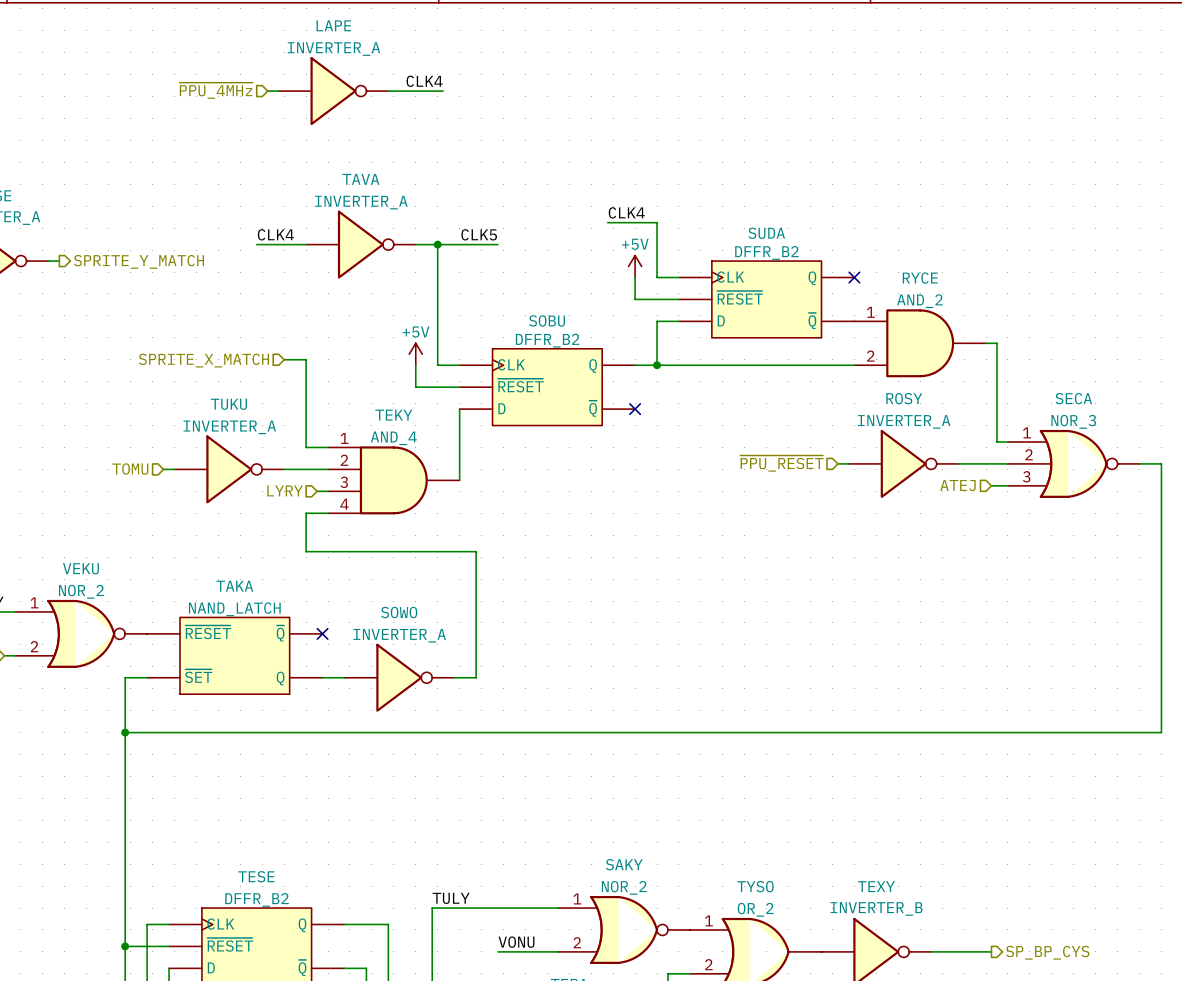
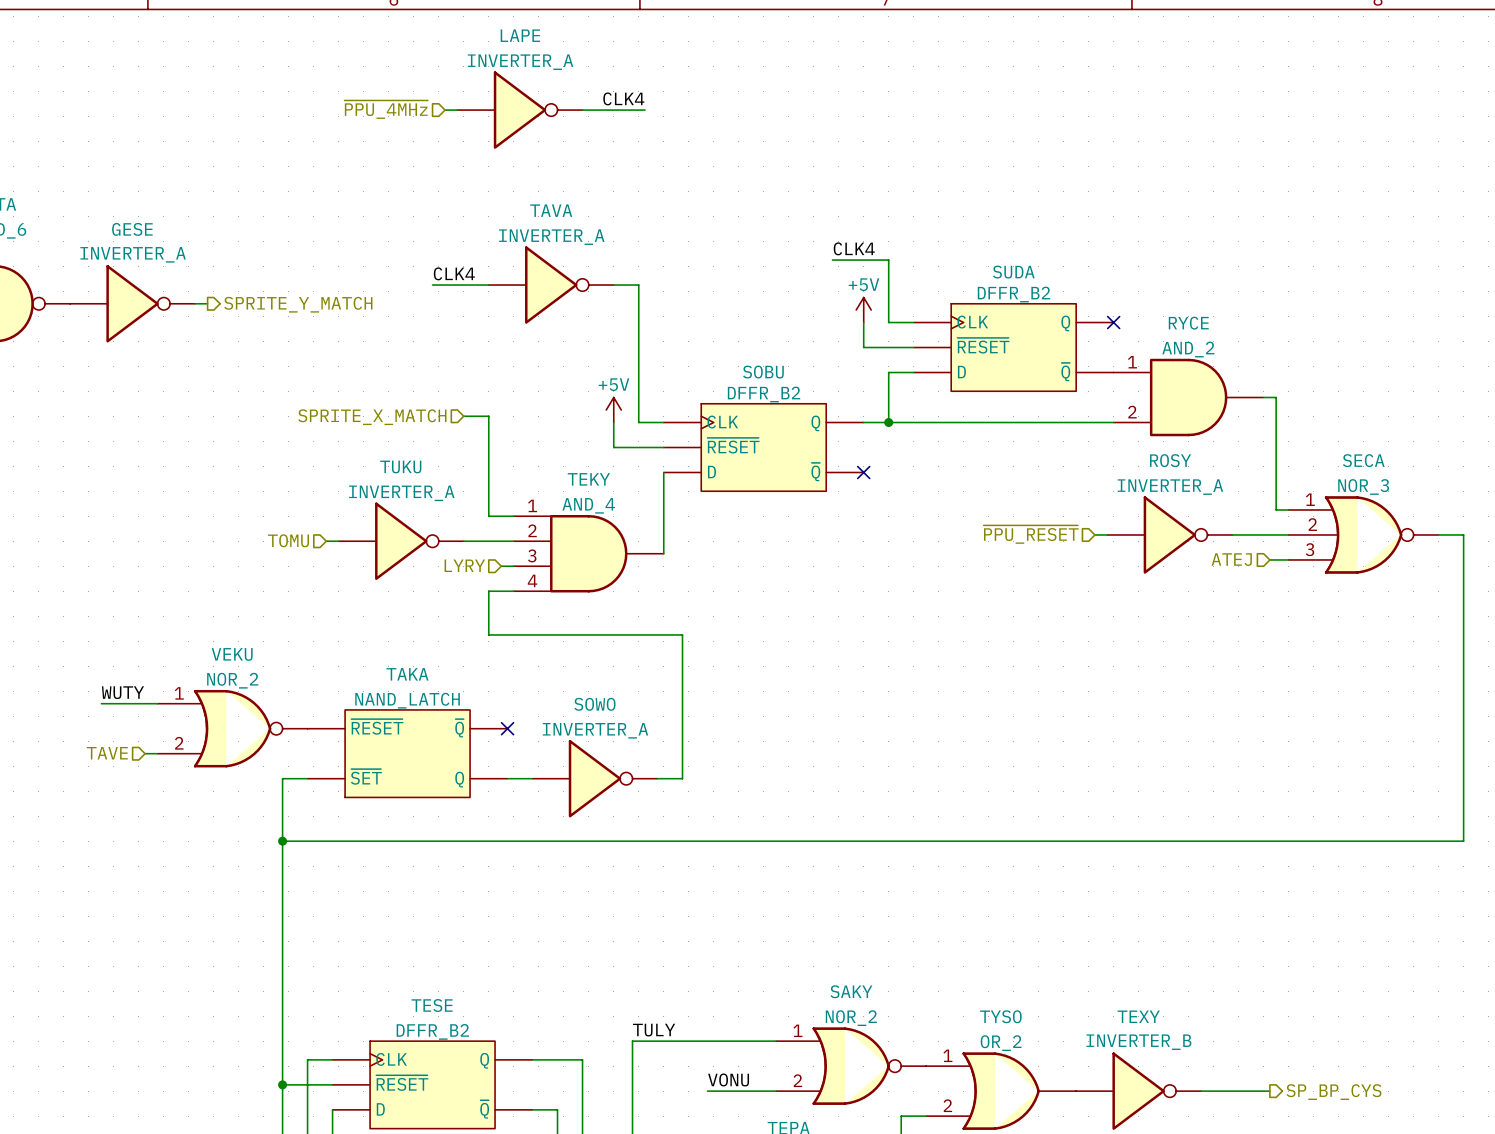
label: CLK5 (479, 234) -> none
wire: (437, 244) (498, 244) -> none
junction: (437, 244) -> none

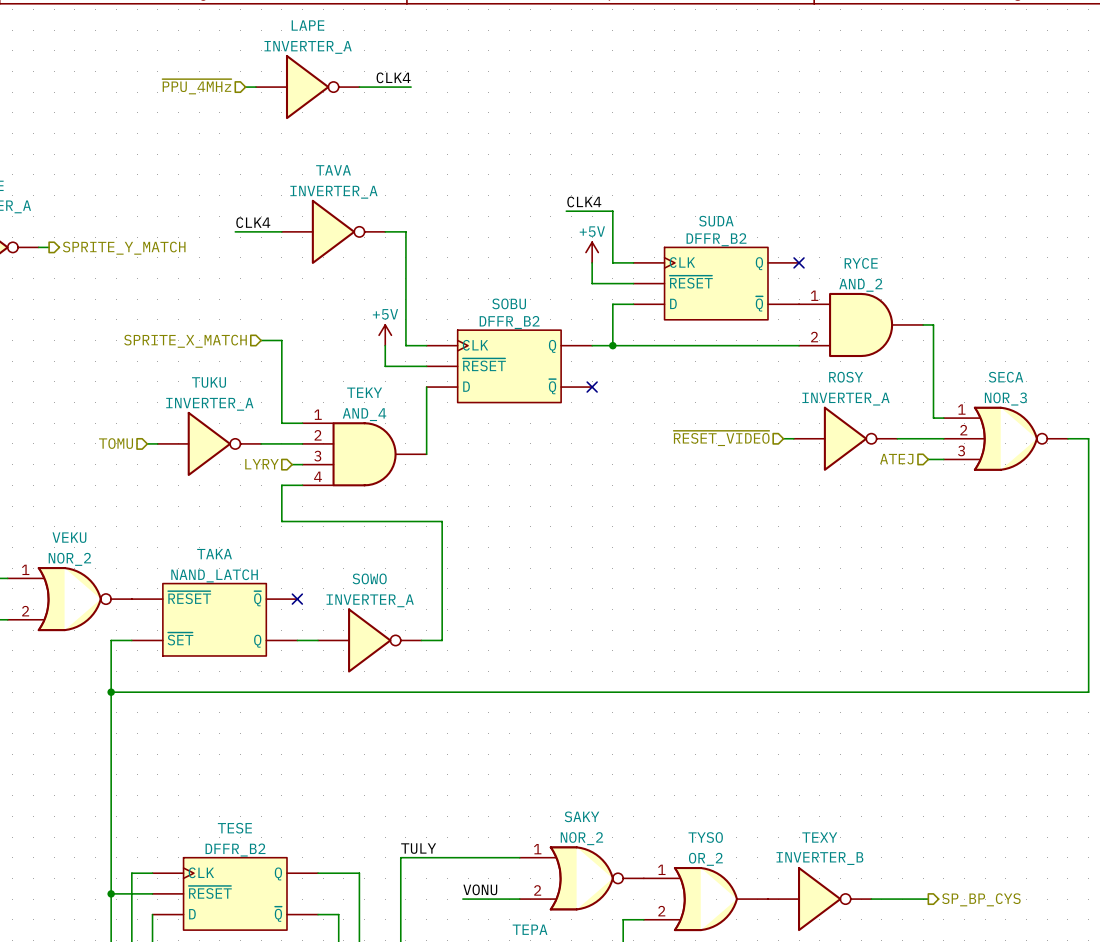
hierarchical label: ~{PPU_RESET} (1031, 534) -> ~{RESET_VIDEO} (721, 438)

